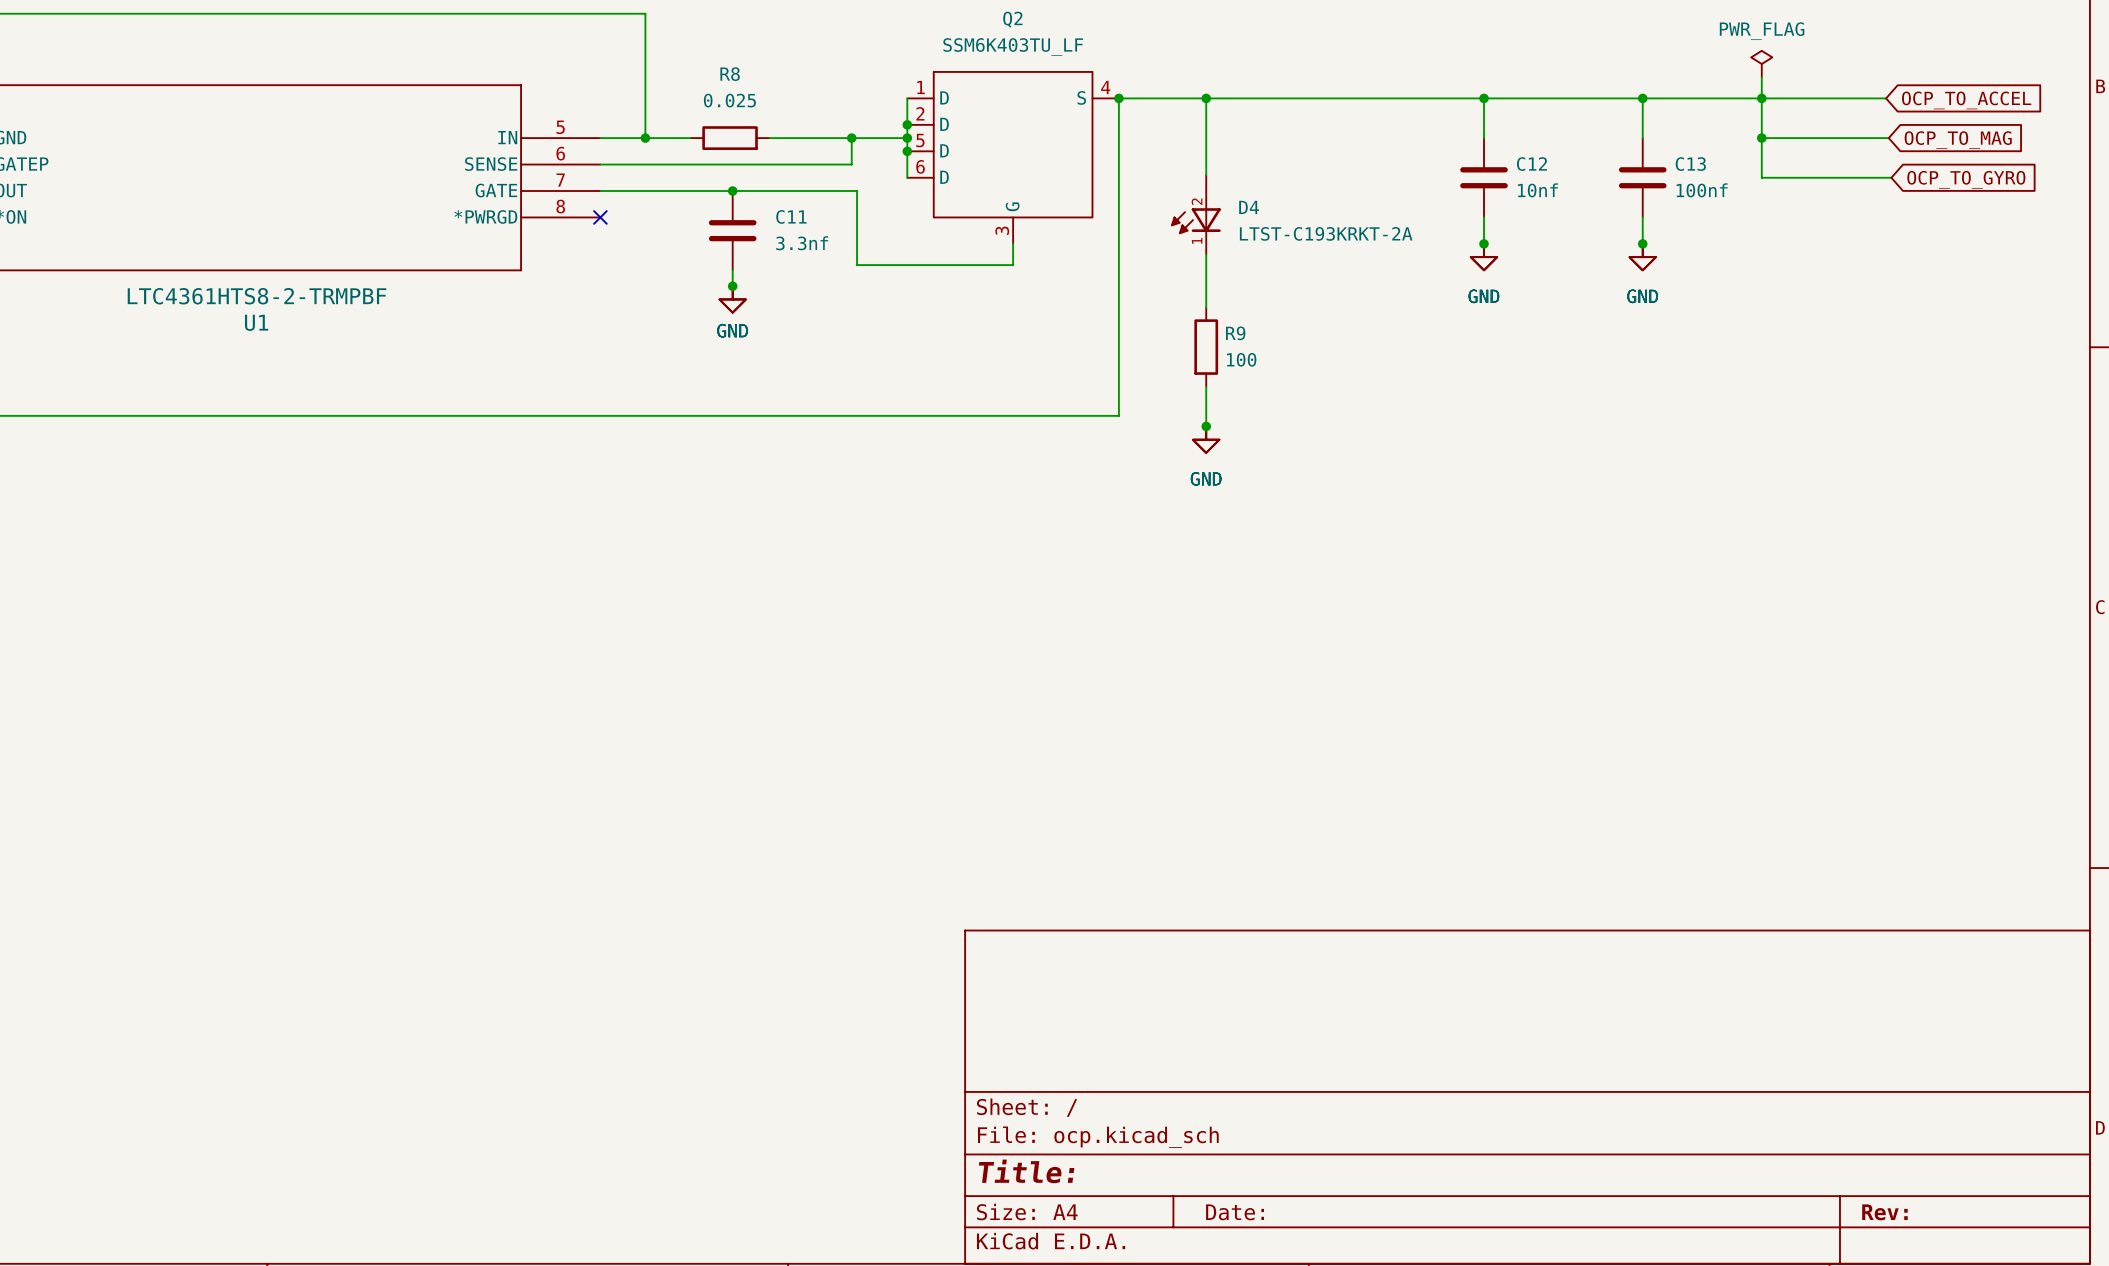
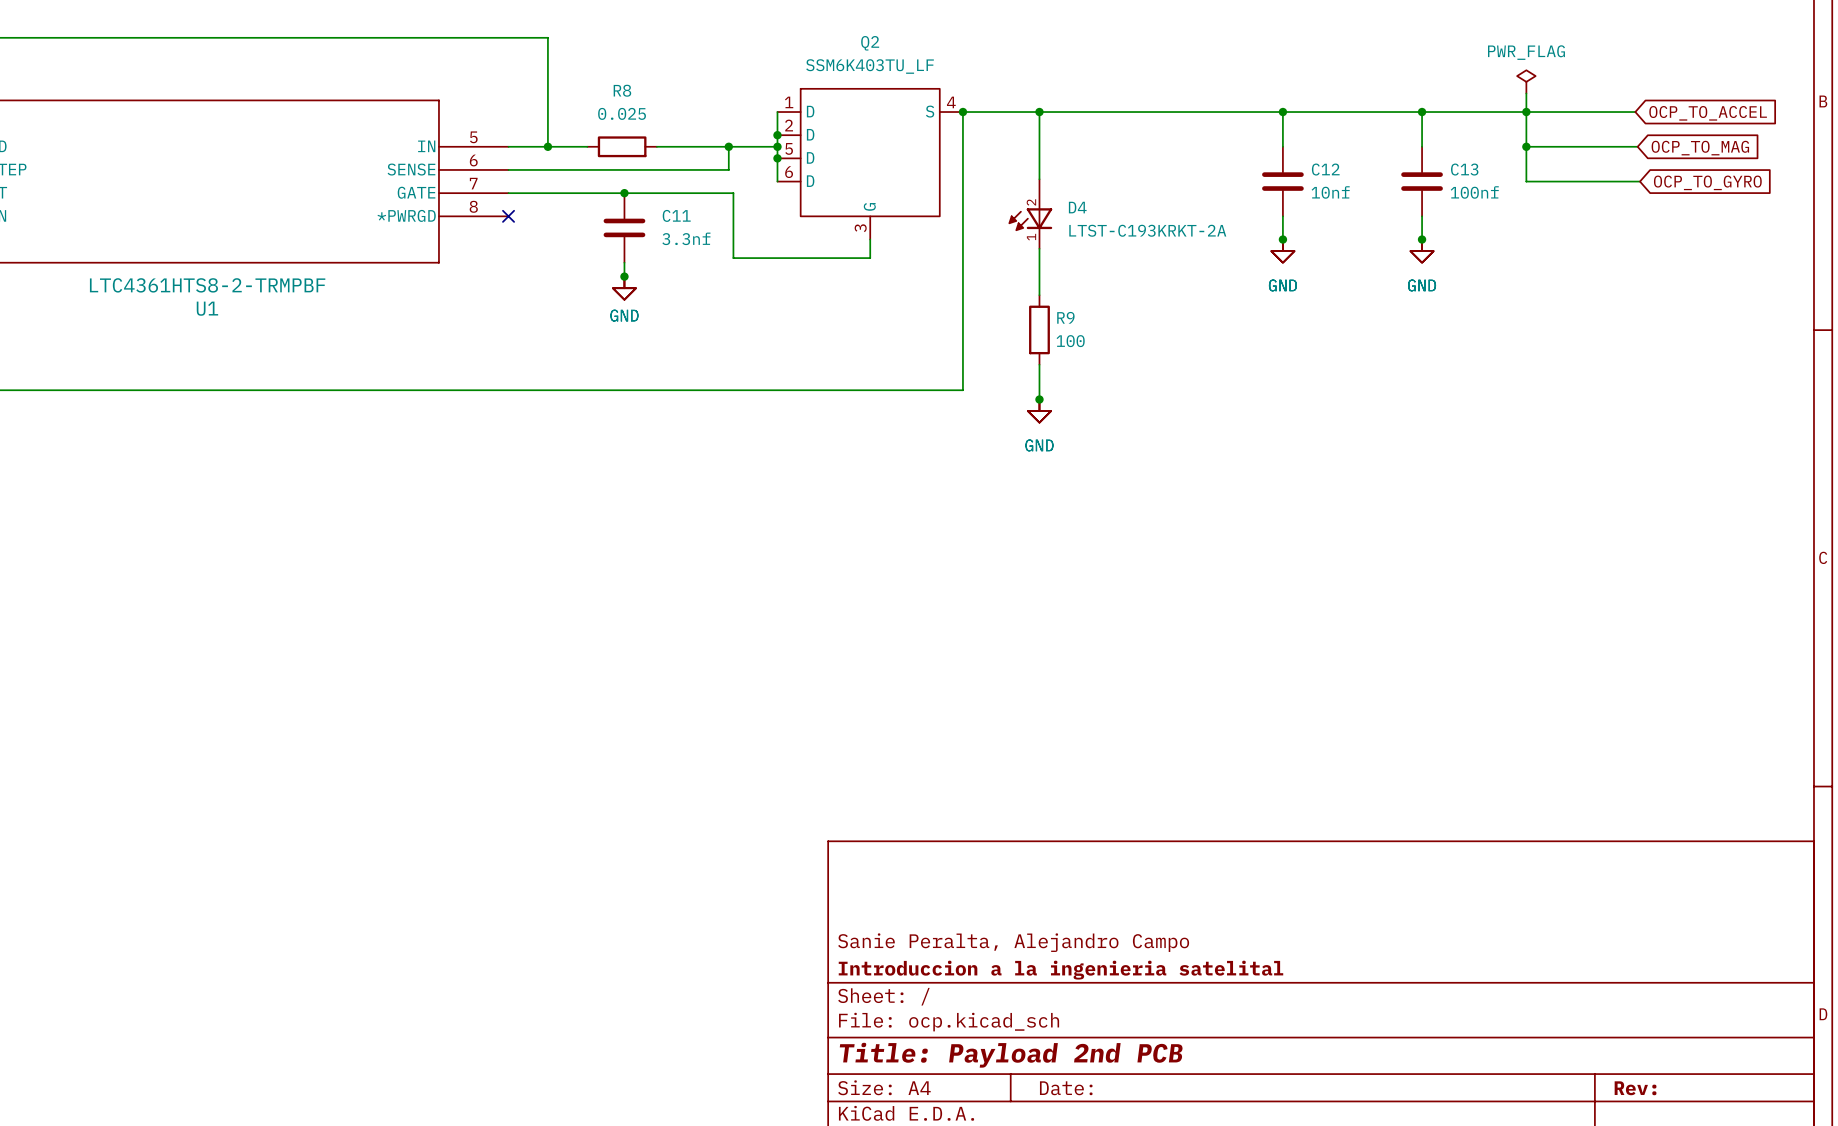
title block: none -> Sanie Peralta, Alejandro Campo (1013, 942)
title block: none -> Introduccion a la ingenieria satelital (1060, 970)
title block: Title: (1026, 1171) -> Title: Payload 2nd PCB (1011, 1055)

